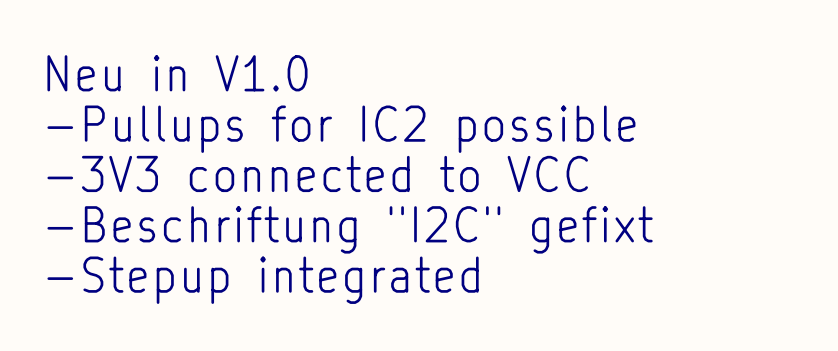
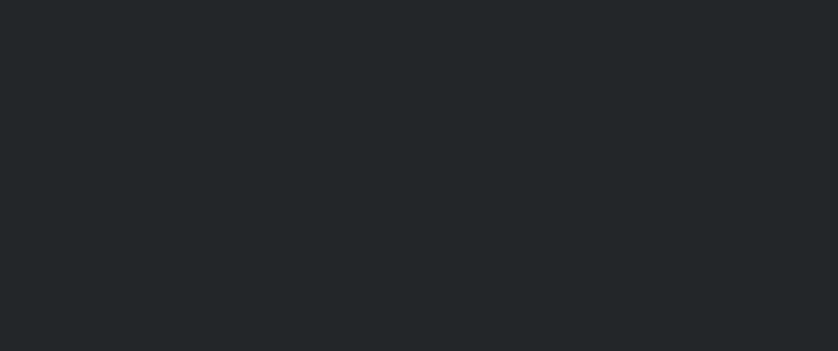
text: Neu in V1.0 (177, 73) -> none
text: -Pullups for IC2 possible (341, 129) -> none
text: -3V3 connected to VCC (317, 173) -> none
text: -Beschriftung "I2C" gefixt (350, 229) -> none
text: -Stepup integrated (263, 280) -> none

